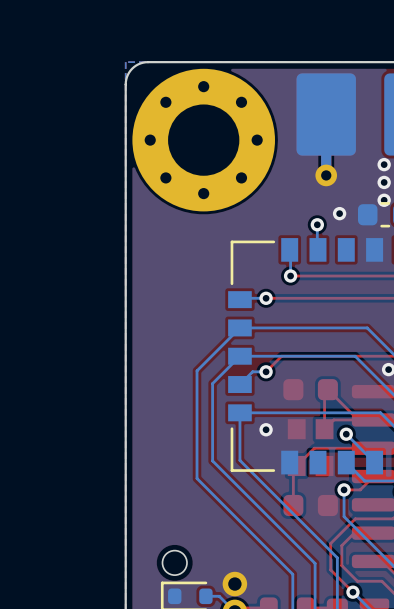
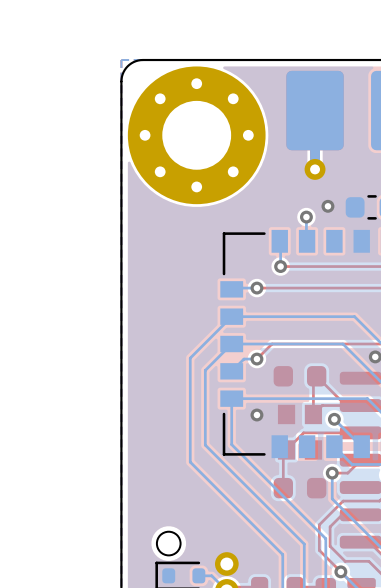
via: (384, 164) -> none
via: (384, 182) -> none
via: (384, 200) -> none

